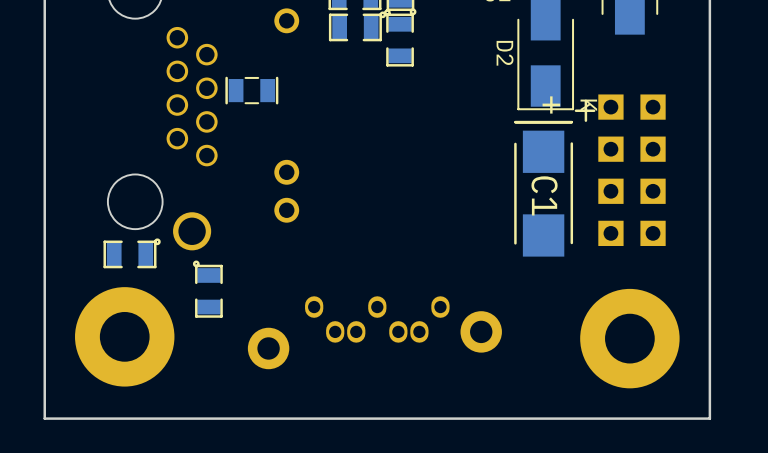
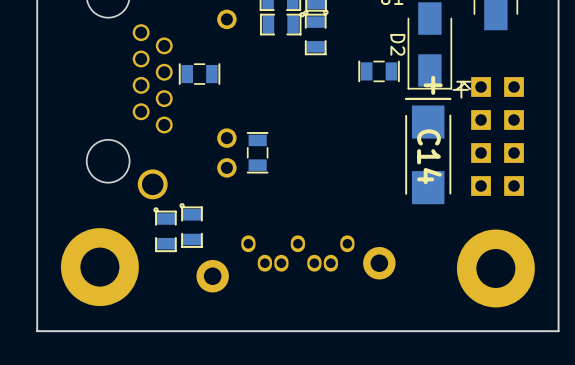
part: none -> (379, 71)
part: none -> (257, 152)
C1 name: C1 (544, 195) -> C14 (429, 156)
part rotation: 0° (132, 253) -> 90° counterclockwise (191, 225)
part position: (132, 253) -> (191, 225)

